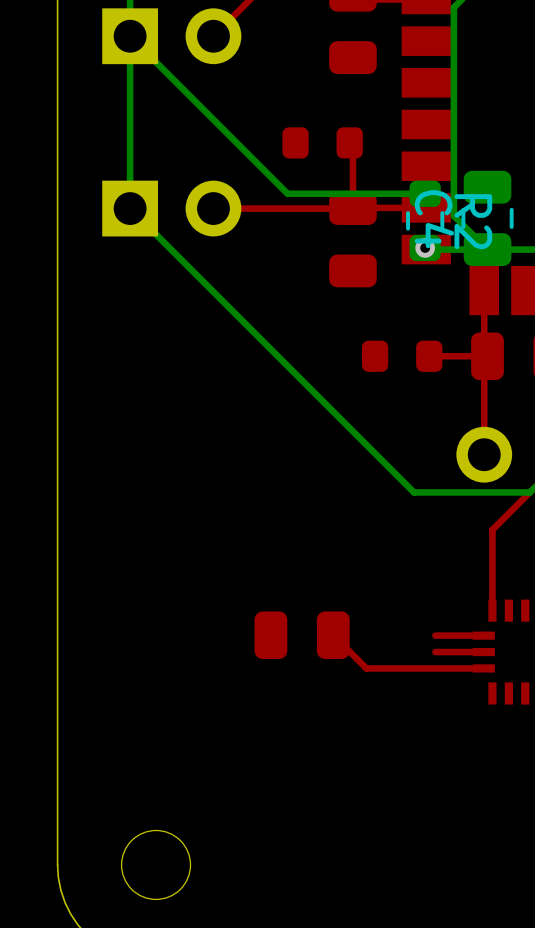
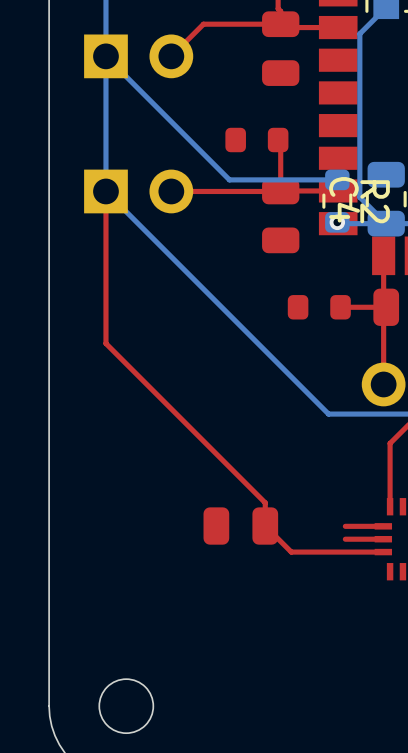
top track: none -> (105, 191) (105, 343) (265, 502) (265, 526)

